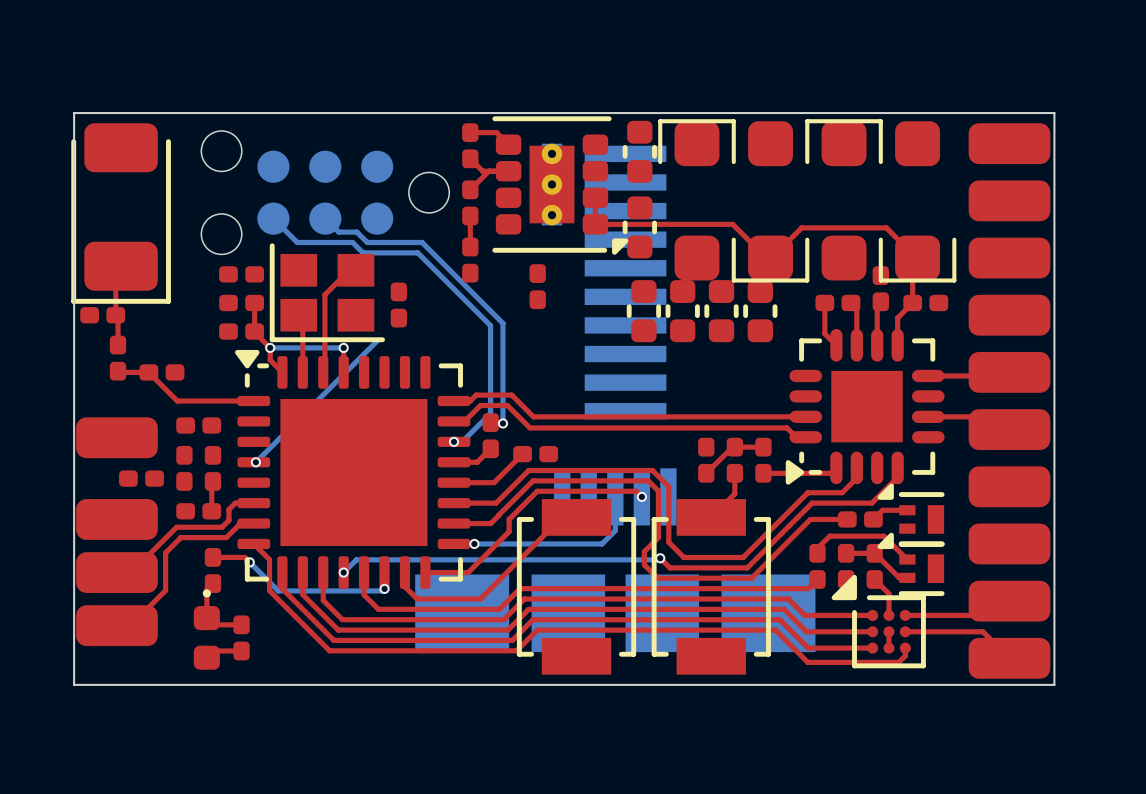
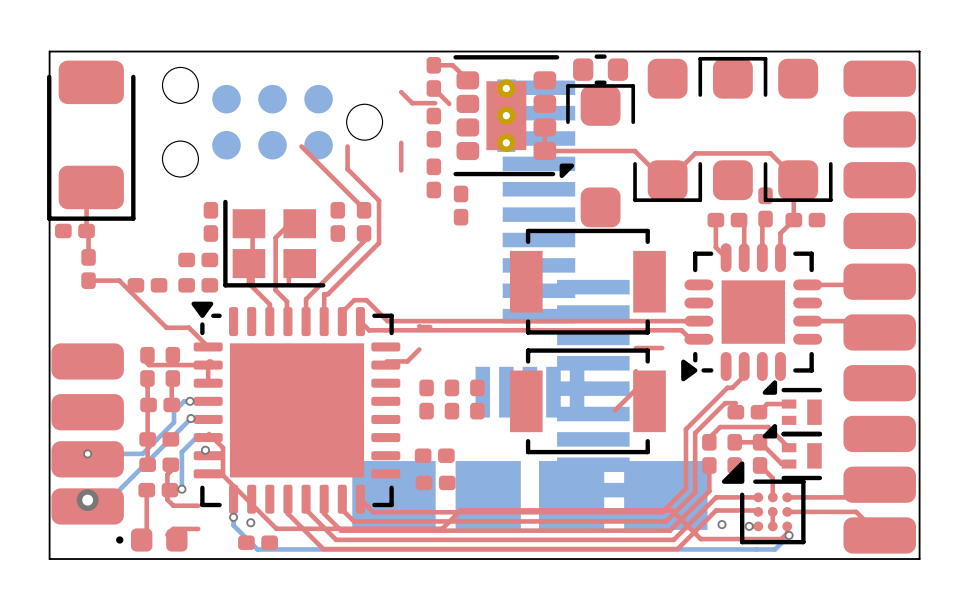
top track: none -> (433, 65) (452, 65) (467, 80)
top track: (470, 132) (496, 132) (508, 144) -> none
part: none -> (600, 69)
part: none -> (433, 76)
part: (470, 145) -> none
part: (639, 151) -> none
top track: none -> (433, 88) (449, 103)
top track: (488, 171) (470, 189) -> none
part position: (560, 185) -> (513, 116)
top track: (595, 197) (595, 224) (733, 225) -> (544, 127) (544, 151) (634, 151)
part: none -> (433, 127)
part position: (697, 199) -> (600, 155)
part: (470, 202) -> none
bottom track: (273, 218) (297, 242) (352, 242) (363, 252) (417, 252) (490, 325) (490, 413) (462, 441) (453, 441) -> none
bottom track: (325, 218) (338, 232) (356, 232) (367, 242) (422, 242) (502, 323) (502, 423) -> none
top track: none -> (301, 146) (364, 210)
top track: none -> (347, 146) (347, 169) (379, 200) (379, 243) (327, 294) (324, 294) (324, 321)
part: (639, 227) -> none
part: none -> (433, 178)
part: (470, 260) -> none
top track: (355, 270) (349, 270) (324, 294) (324, 374) (323, 376) -> none
part: (241, 274) -> none
part position: (327, 292) -> (274, 243)
part rotation: 0° (241, 302) -> 90° clockwise (210, 221)
part: none -> (364, 221)
top track: (254, 307) (254, 335) -> none
top track: none -> (299, 223) (289, 223) (275, 237) (275, 290) (287, 301) (287, 321)
part: (643, 311) -> none
part: (682, 311) -> none
part: (721, 311) -> none
part: (760, 311) -> none
top track: none -> (364, 233) (364, 241) (306, 299) (306, 321)
part position: (241, 331) -> (198, 259)
top track: (254, 332) (270, 347) (270, 360) (282, 372) -> none
bottom track: (377, 340) (255, 462) -> none
bottom track: (270, 347) (343, 347) -> none
via: (270, 347) -> none
via: (343, 347) -> none
top track: none -> (248, 263) (248, 283) (269, 304) (269, 321)
top track: (118, 371) (148, 372) (177, 401) (253, 401) -> (88, 280) (119, 280) (166, 327) (188, 327) (208, 346)
part position: (161, 372) -> (147, 285)
part: none -> (587, 281)
part: none -> (198, 285)
top track: (453, 401) (470, 401) (476, 395) (511, 395) (533, 416) -> (342, 321) (342, 312) (354, 300) (366, 300) (387, 321) (457, 321)
top track: (453, 421) (464, 421) (480, 405) (507, 405) (529, 427) (786, 427) -> (360, 321) (369, 330) (682, 330)
via: (502, 423) -> none
part: (198, 425) -> none
part: (490, 435) -> none
part position: (117, 437) -> (87, 361)
via: (453, 441) -> none
top track: (732, 447) (706, 473) -> none
top track: (522, 454) (494, 482) (453, 482) -> none
part: (535, 454) -> none
part: (706, 460) -> none
part: (734, 460) -> none
part: (763, 460) -> none
via: (255, 462) -> none
top track: none -> (146, 362) (149, 365) (208, 365) (208, 383)
top track: (836, 467) (830, 473) (763, 473) -> none
top track: (897, 467) (897, 477) (871, 503) (812, 503) (747, 567) (669, 567) (660, 558) -> none
part: (352, 469) -> none
part: (141, 478) -> none
top track: (856, 478) (842, 492) (807, 492) (743, 557) (684, 557) (668, 542) (668, 486) (652, 470) (528, 470) (496, 503) (453, 503) -> none
top track: none -> (146, 385) (147, 464)
bottom track: (615, 496) (615, 530) (602, 543) (474, 543) -> none
top track: (641, 496) (636, 491) (537, 491) (509, 519) (509, 531) (468, 572) (425, 572) -> none
via: (641, 496) -> none
top track: (253, 503) (235, 503) (228, 509) (228, 520) (222, 527) (176, 527) (131, 572) (117, 572) -> none
part: none -> (426, 399)
part: none -> (451, 399)
part: none -> (477, 399)
bottom track: none -> (190, 401) (184, 401) (173, 411) (173, 422) (142, 453) (87, 453)
via: none -> (190, 401)
part: none -> (587, 401)
part: none -> (593, 401)
top track: none -> (735, 403) (725, 403) (695, 433) (695, 492) (666, 521) (353, 521) (342, 509) (342, 499)
part: none -> (295, 407)
top track: (498, 515) (533, 480) (648, 480) (658, 491) (658, 537) (644, 551) (644, 564) (657, 578) (751, 578) (791, 538) -> (360, 499) (373, 512) (662, 512) (685, 488) (685, 429)
top track: (498, 515) (490, 523) (453, 523) -> none
top track: (576, 517) (562, 517) (480, 598) (417, 598) (404, 586) (404, 572) -> none
top track: (810, 519) (847, 519) -> (703, 412) (727, 387) (732, 387) (744, 376)
top track: (253, 523) (239, 523) (226, 537) (180, 537) (165, 552) (165, 590) (130, 625) (117, 625) -> none
bottom track: none -> (190, 418) (109, 500) (87, 500)
via: none -> (190, 418)
via: (474, 543) -> none
part: none -> (159, 439)
bottom track: none -> (194, 439) (181, 452) (181, 489)
top track: (212, 557) (244, 557) (249, 562) -> none
bottom track: (660, 558) (658, 559) (356, 559) (343, 572) -> none
via: (660, 558) -> none
bottom track: (249, 562) (278, 590) (382, 590) (384, 588) -> none
via: none -> (87, 453)
part: none -> (434, 455)
part: (212, 570) -> none
top track: (282, 572) (282, 588) (333, 640) (512, 640) (533, 619) (779, 619) (808, 648) (862, 648) -> none
top track: (302, 572) (302, 594) (338, 630) (508, 630) (528, 609) (784, 609) (806, 631) (872, 631) -> (287, 499) (287, 513) (323, 549) (677, 549) (716, 510) (758, 511)
top track: (323, 572) (323, 600) (342, 619) (503, 619) (524, 599) (788, 599) (804, 615) (825, 615) -> (306, 499) (306, 509) (336, 539) (673, 539) (716, 497)
via: (343, 572) -> none
top track: (364, 572) (364, 595) (378, 609) (499, 609) (520, 588) (808, 588) (817, 579) -> (324, 499) (324, 513) (341, 530) (669, 530) (709, 491) (709, 465)
part: none -> (159, 464)
part: (576, 586) -> none
part: (711, 586) -> none
via: (384, 588) -> none
part: none -> (435, 482)
via: none -> (181, 489)
top track: none -> (146, 490) (146, 534) (141, 539)
part: none -> (158, 490)
via: none -> (87, 500)
part rotation: 0° (206, 629) -> 90° counterclockwise (151, 539)
part: (241, 637) -> none
bottom track: none -> (233, 517) (233, 525) (257, 549) (775, 549) (789, 535)
via: none -> (233, 517)
via: none -> (250, 522)
via: none -> (722, 524)
via: none -> (749, 526)
via: none -> (789, 535)
part: none -> (258, 542)

